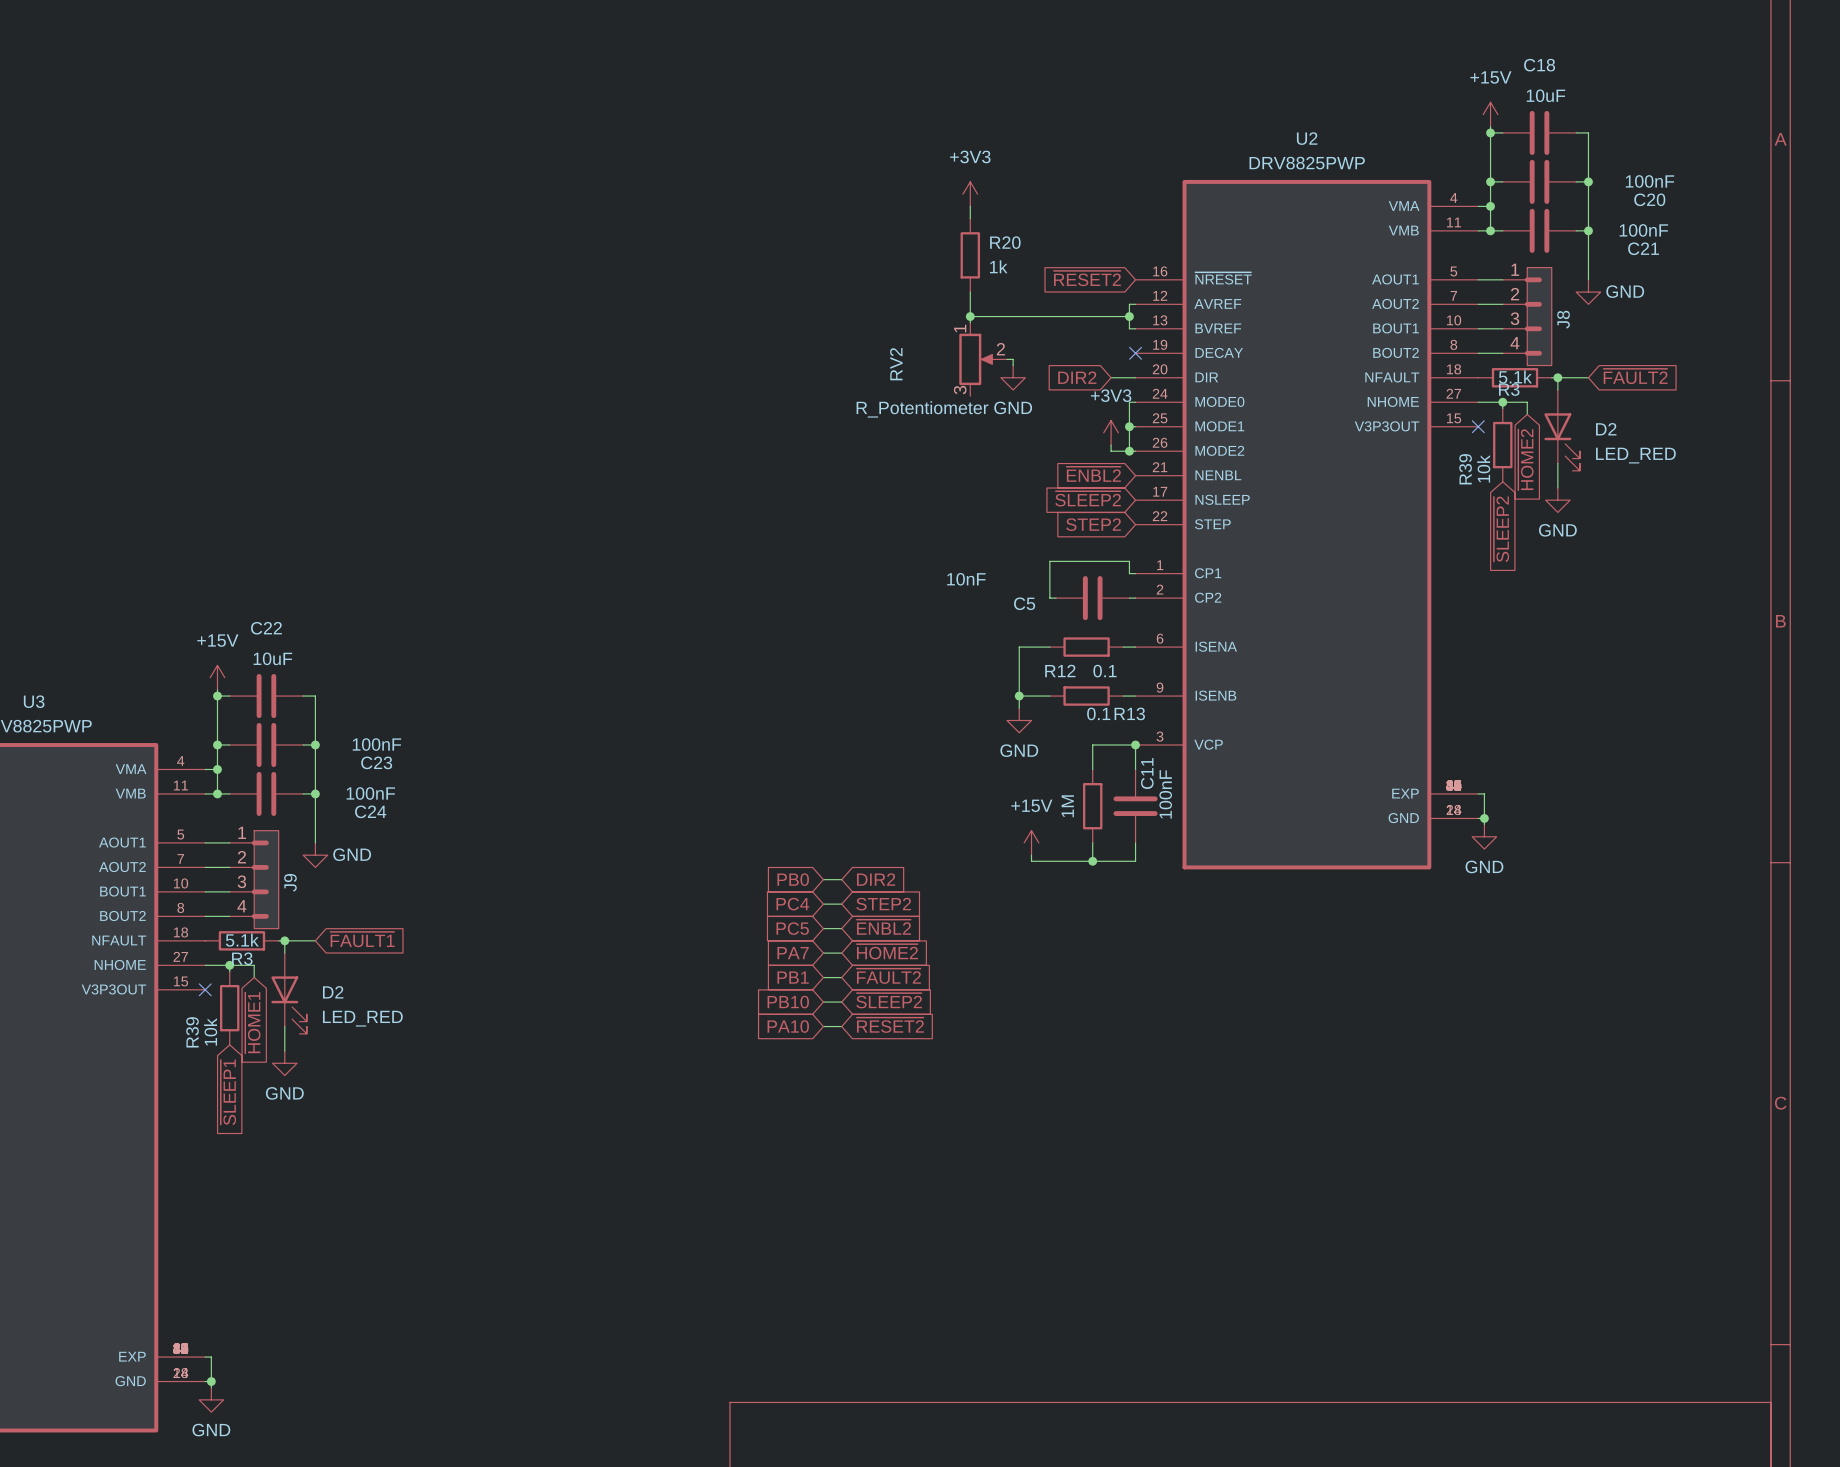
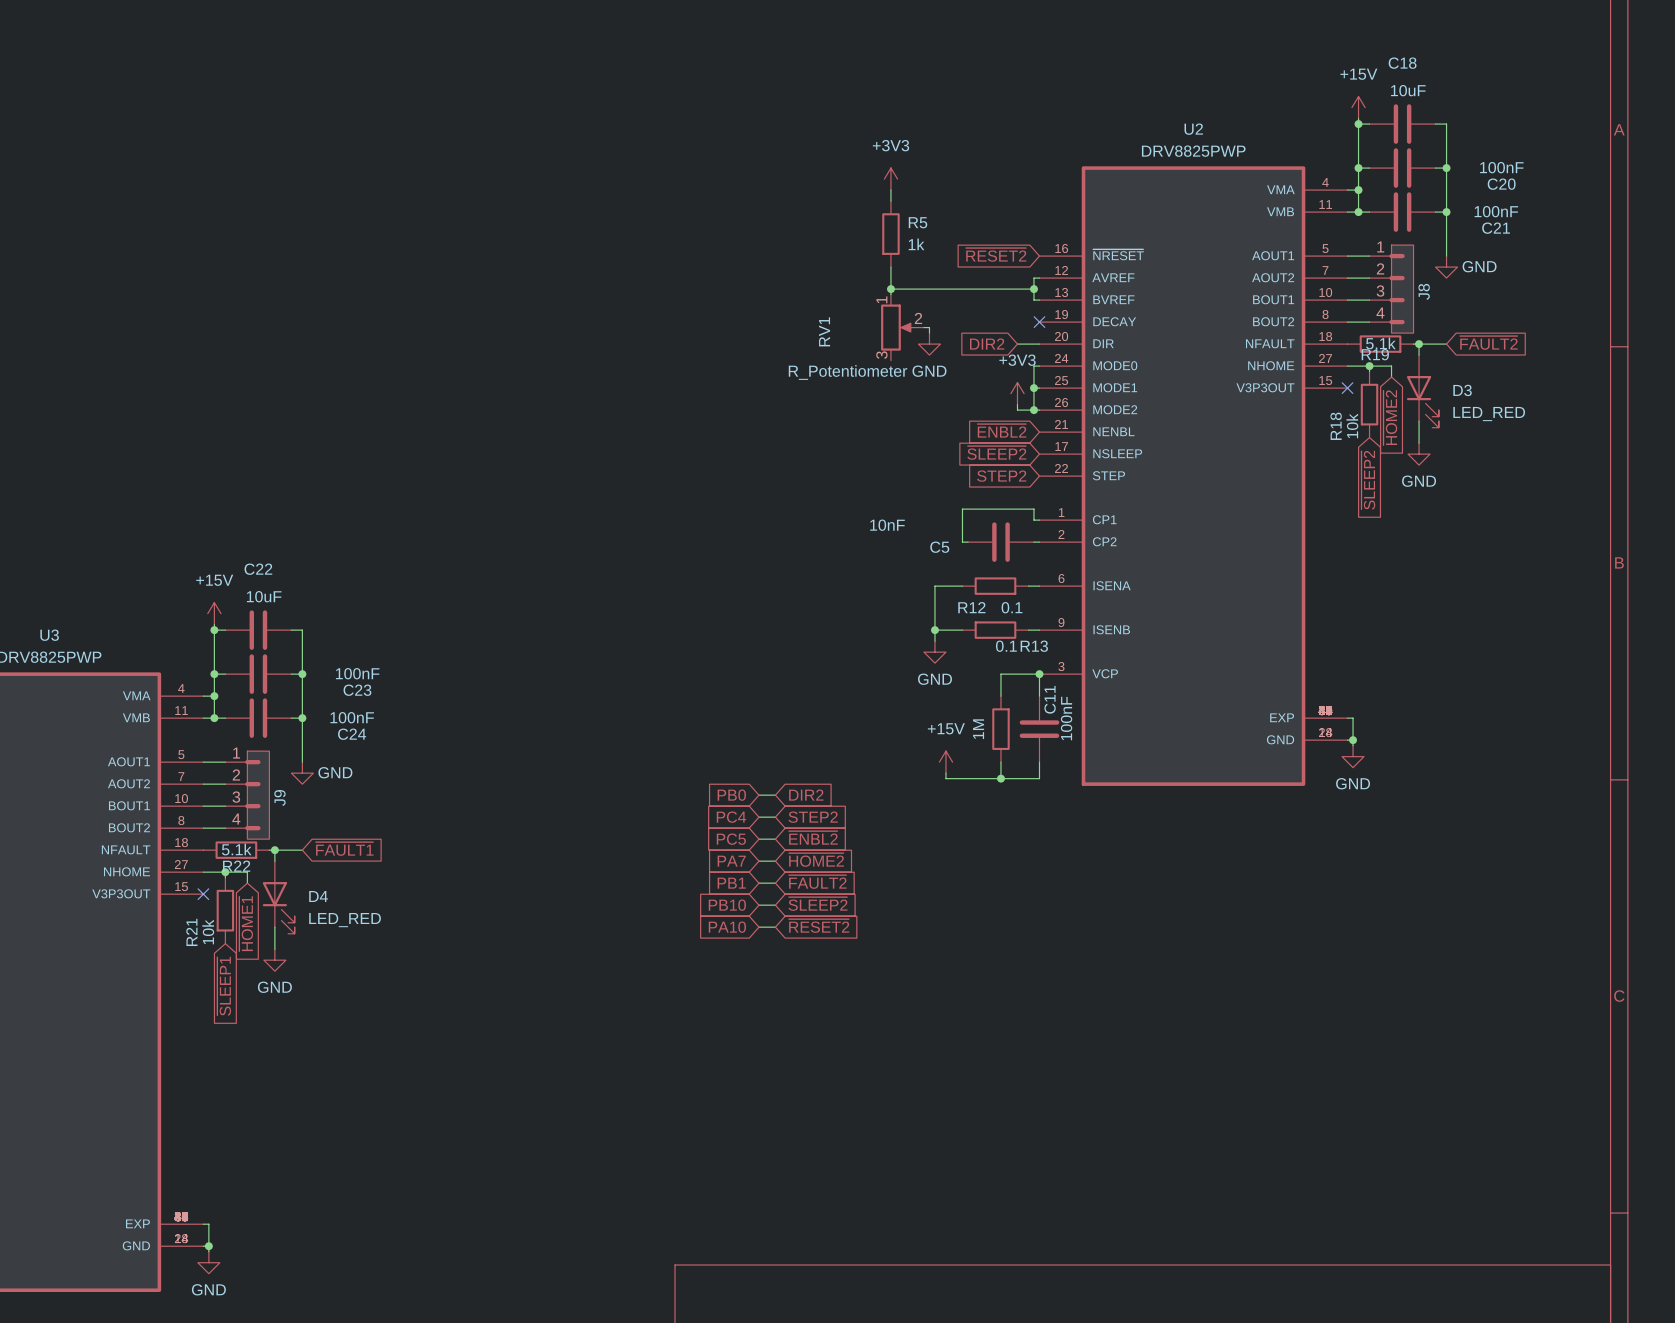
R20 name: R20 (1005, 242) -> R5 (918, 222)
RV2 name: RV2 (896, 364) -> RV1 (824, 331)
R3 name: R3 (1509, 389) -> R19 (1375, 354)
D2 name: D2 (1606, 429) -> D3 (1462, 390)
R39 name: R39 (1465, 469) -> R18 (1336, 426)
R3 name: R3 (242, 958) -> R22 (236, 866)
D2 name: D2 (333, 992) -> D4 (318, 896)
R39 name: R39 (192, 1032) -> R21 (191, 932)

